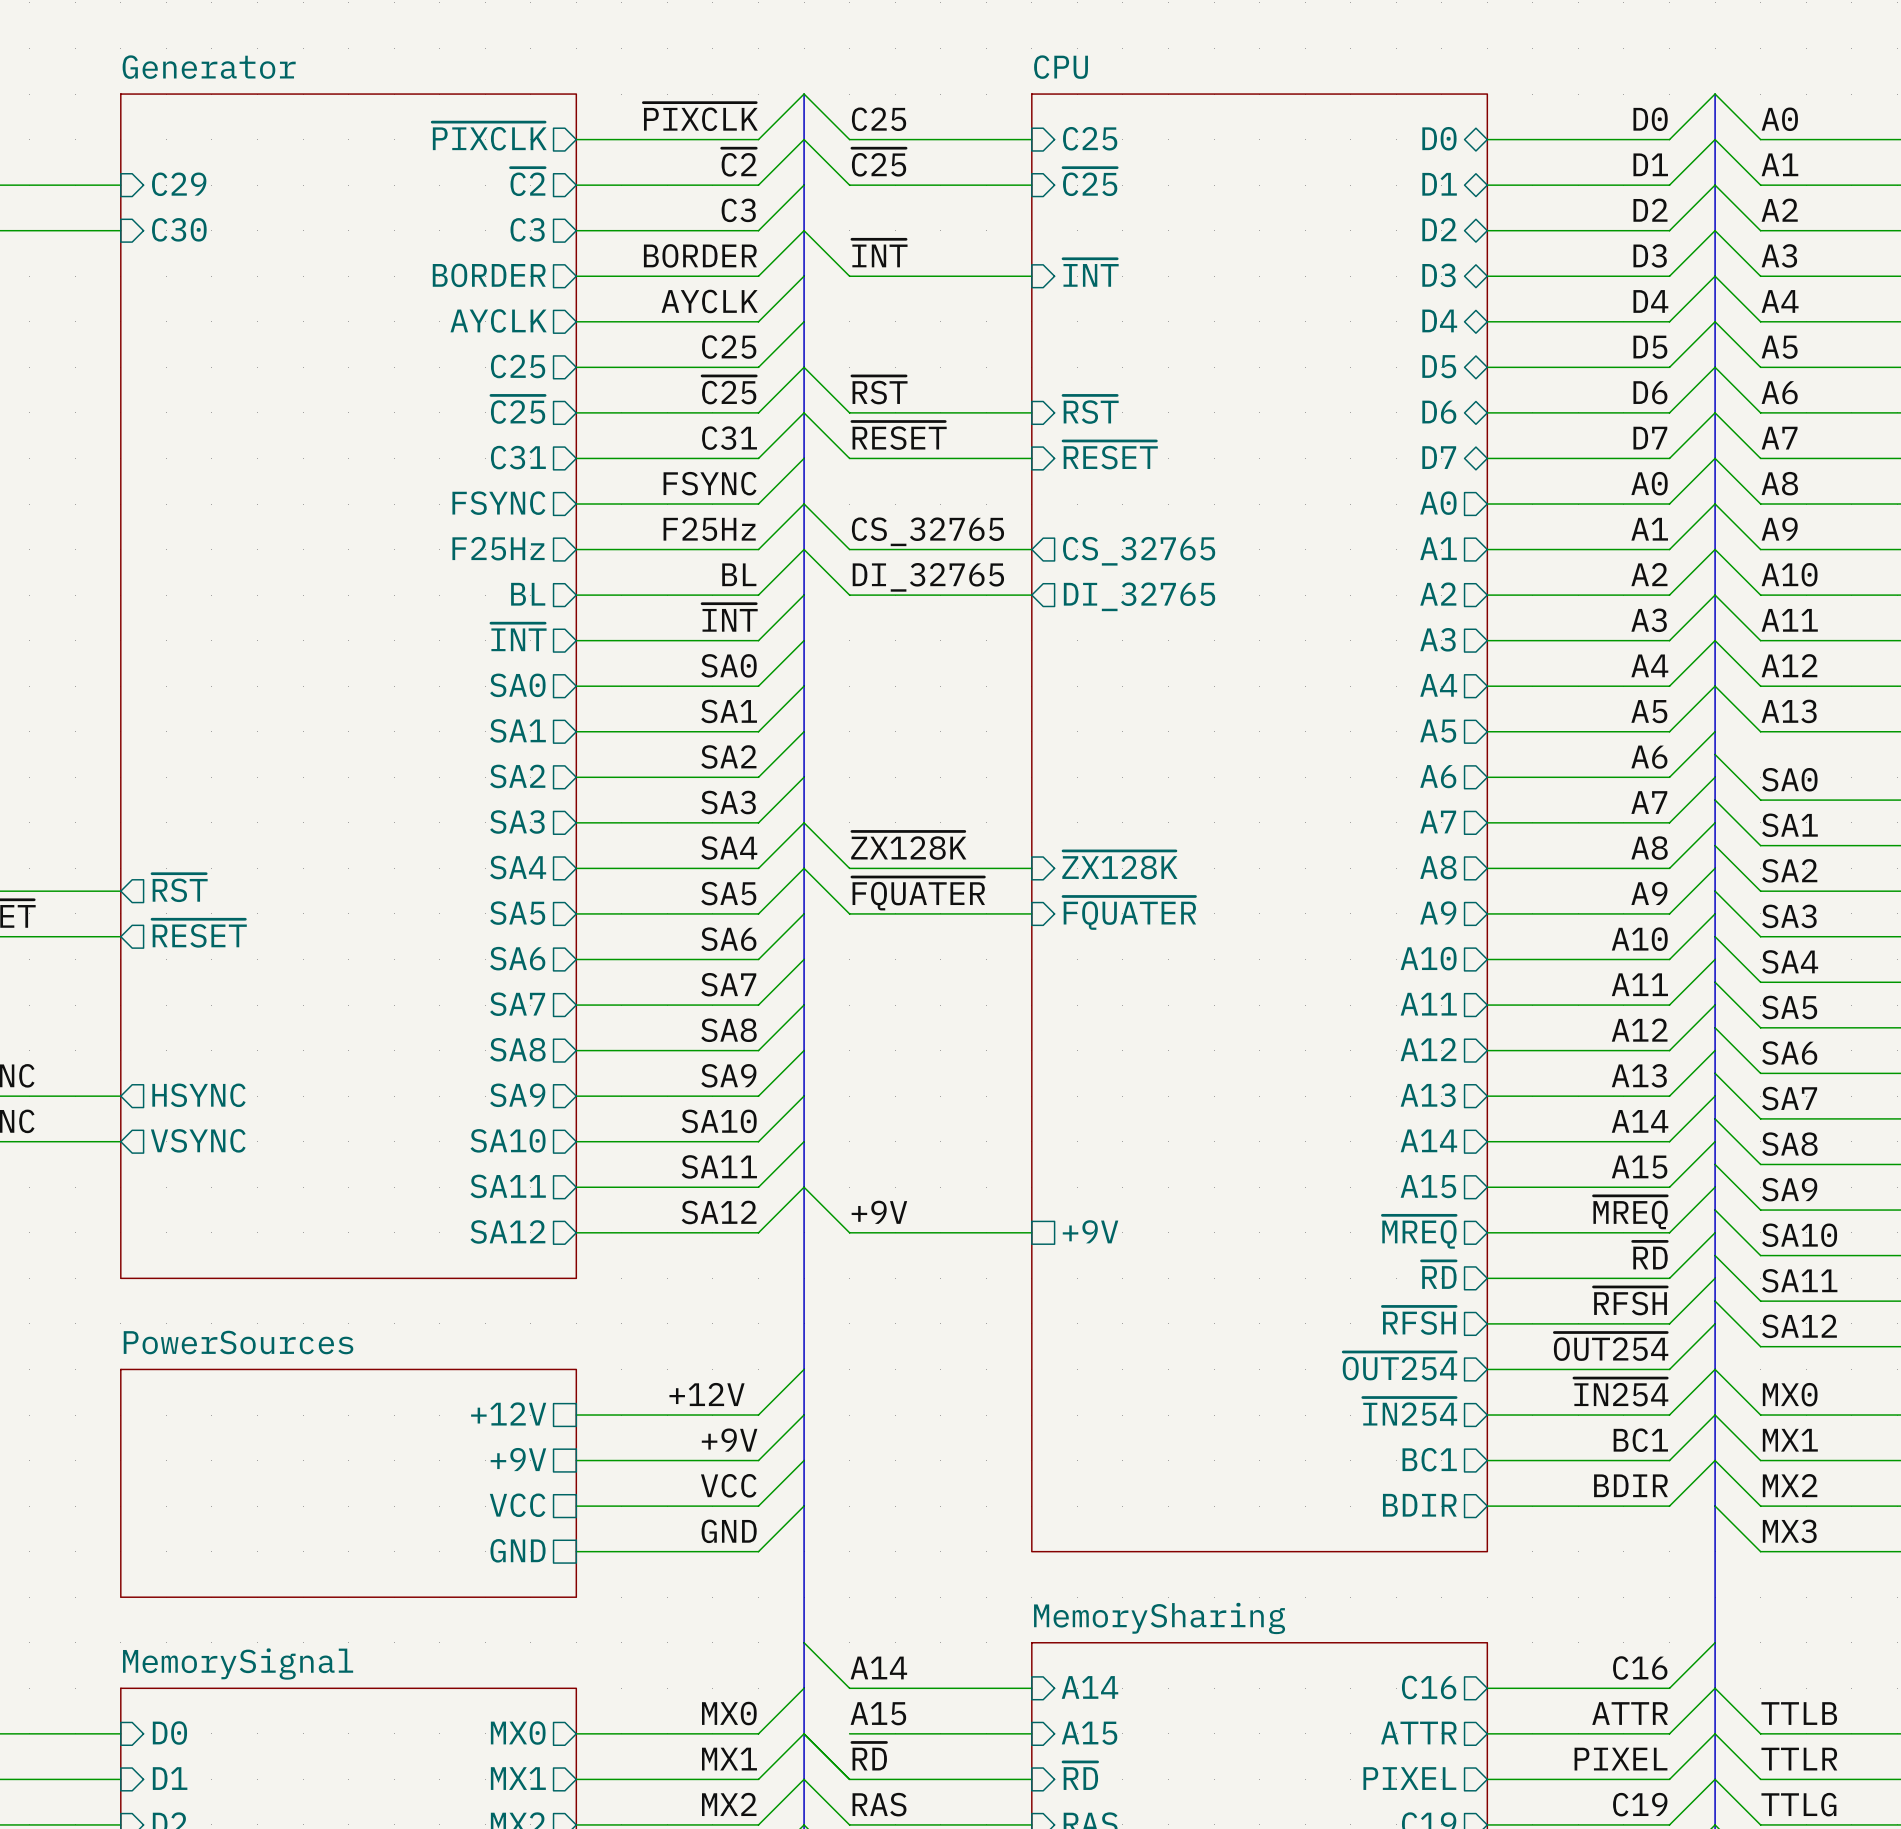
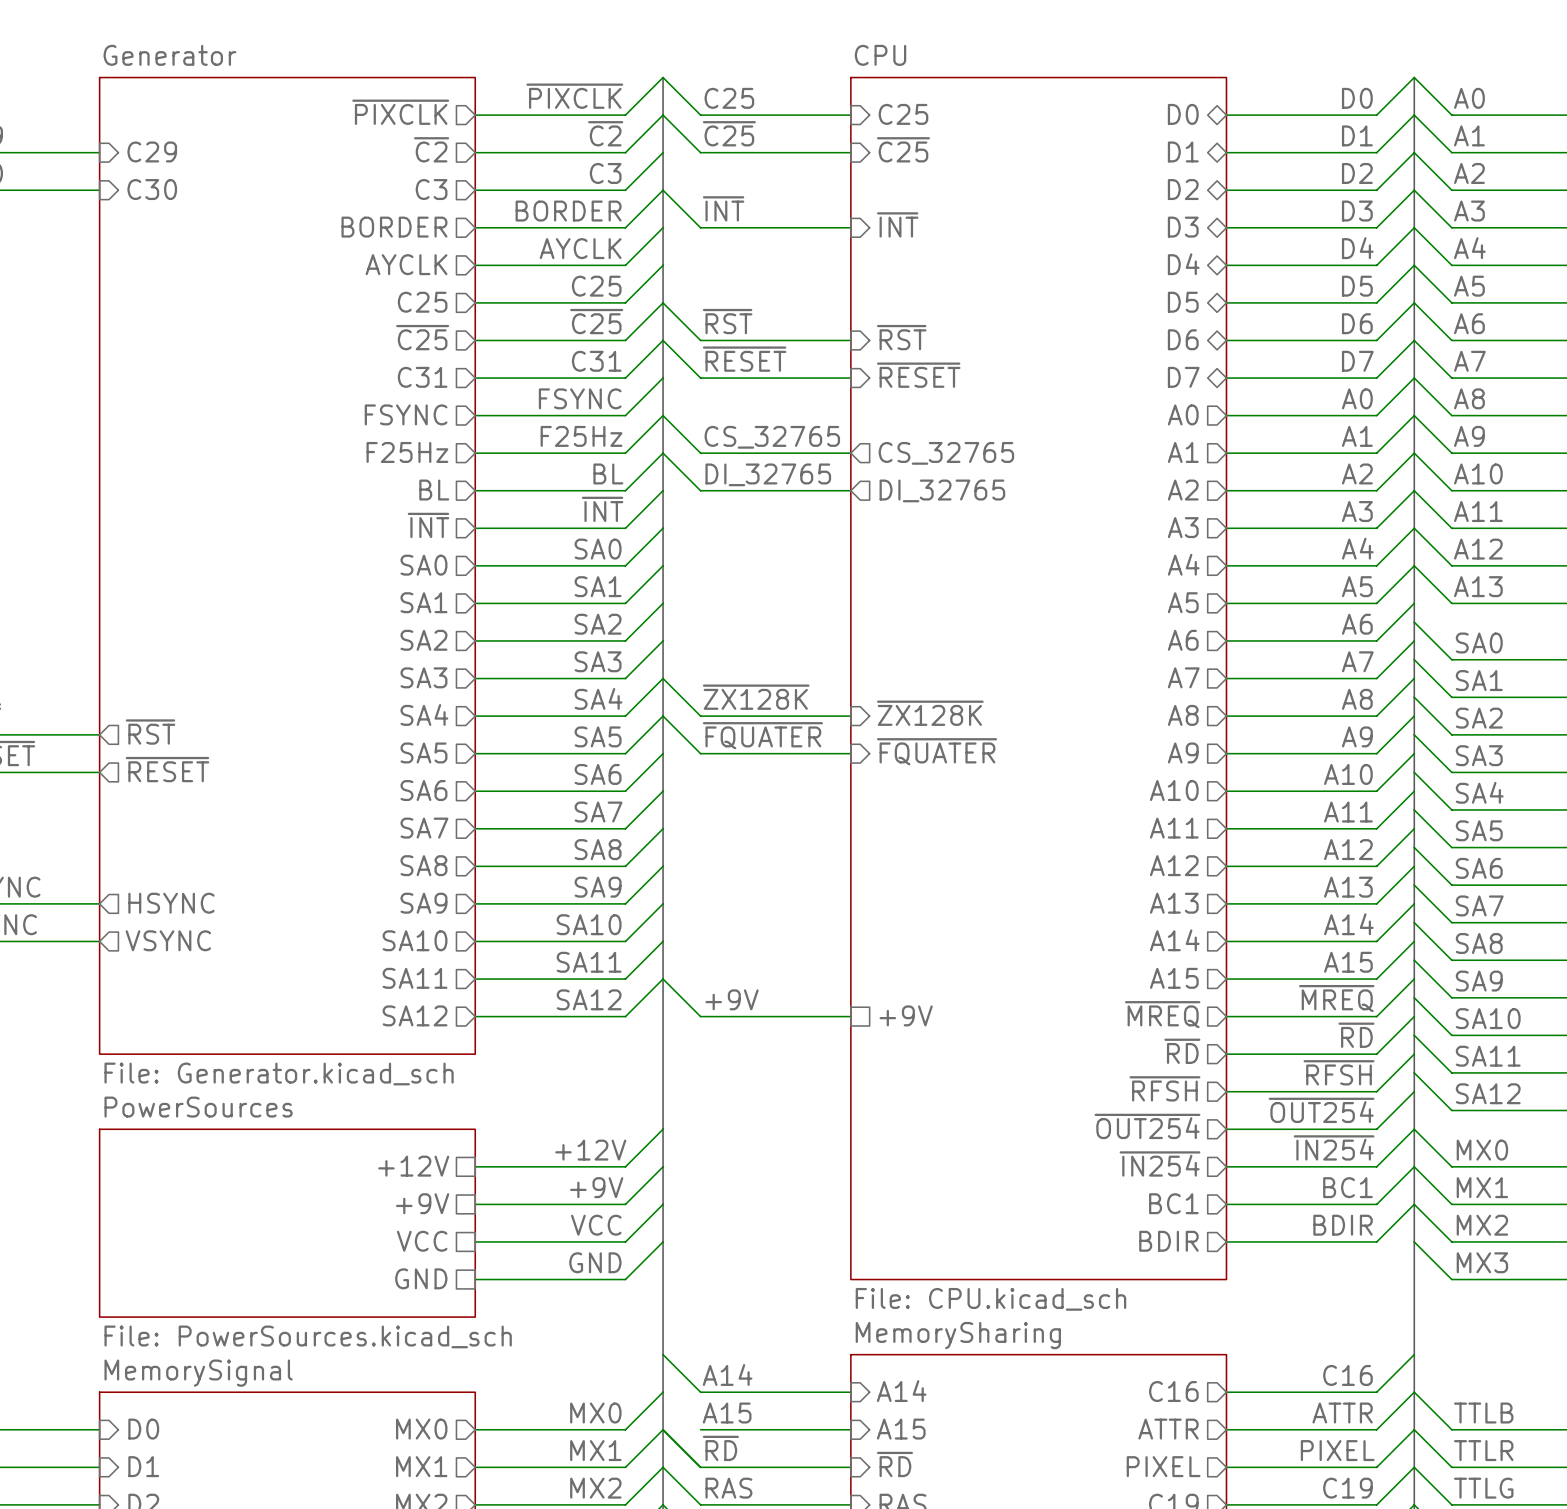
sheet Generator value: none -> File: Generator.kicad_sch (279, 1073)
sheet CPU value: none -> File: CPU.kicad_sch (990, 1299)
sheet PowerSources value: none -> File: PowerSources.kicad_sch (308, 1336)

